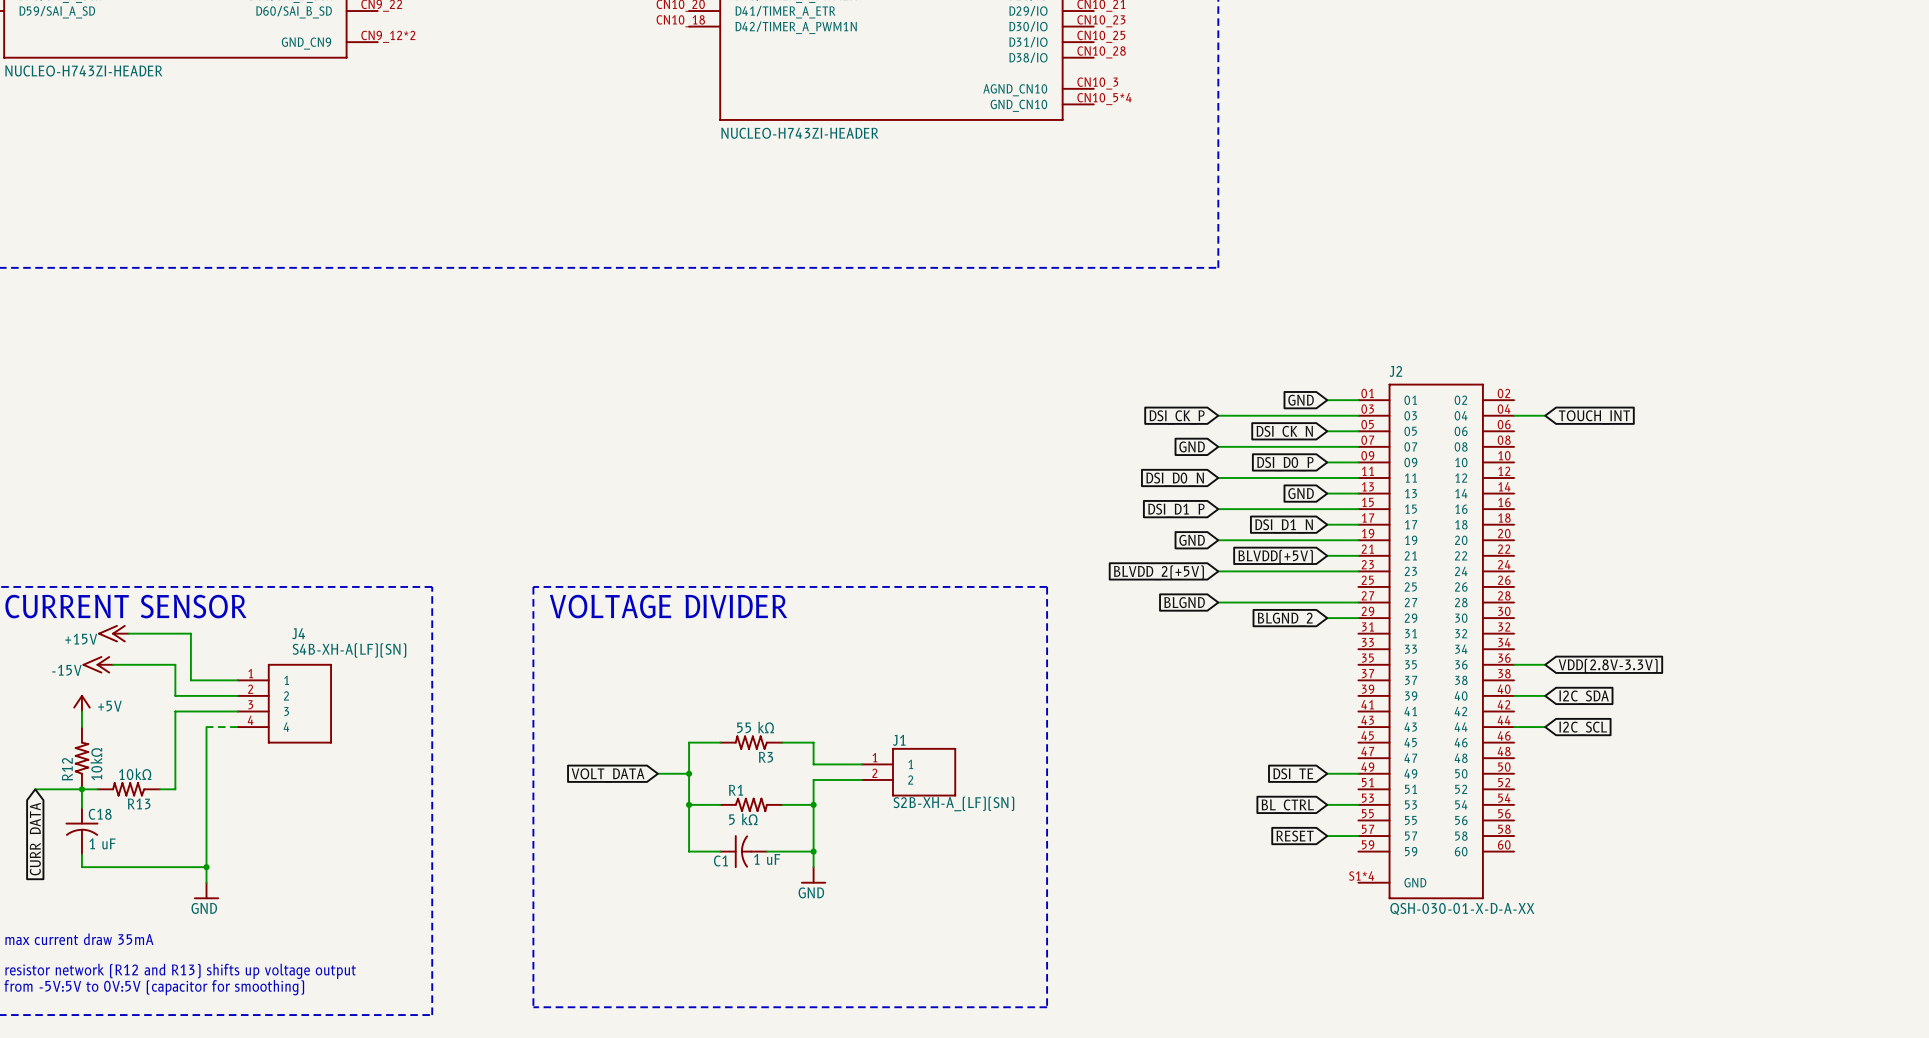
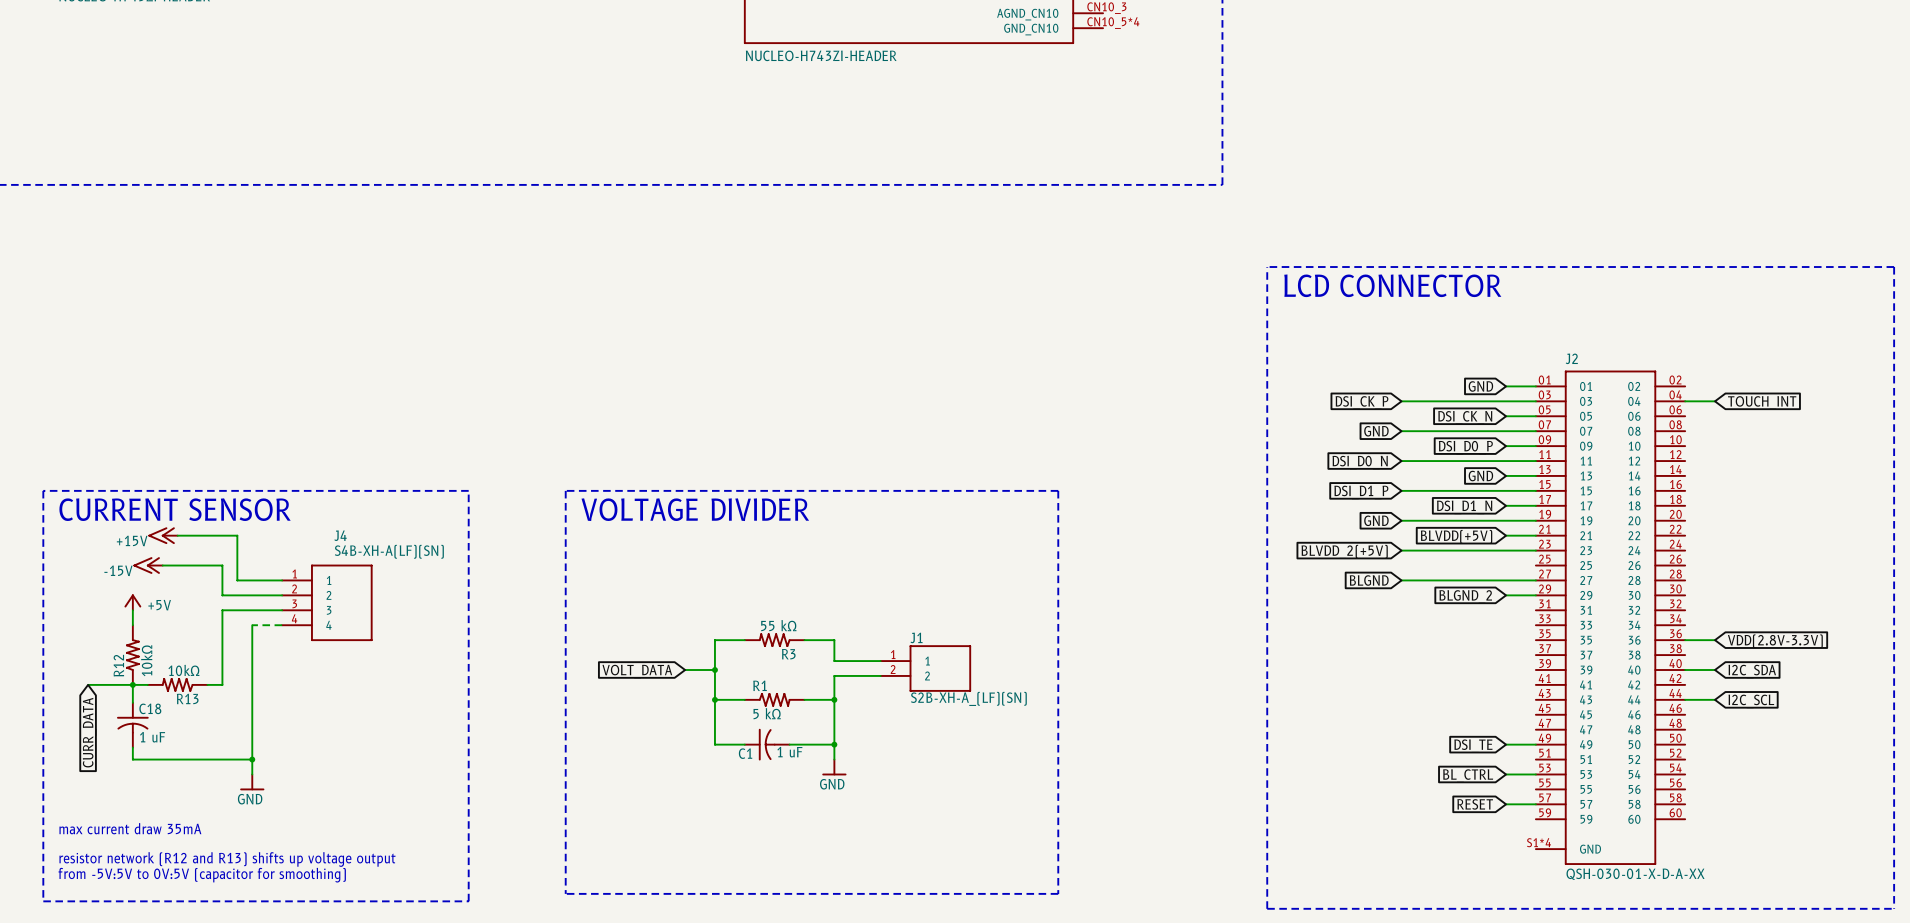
line: none -> (1267, 267) (1894, 267) (1894, 908) (1267, 908) (1267, 267)
text: none -> LCD CONNECTOR (1392, 285)
global label: GND (1301, 400) -> none
wire: (1327, 400) (1358, 400) -> none
wire: (1218, 415) (1358, 415) -> none
wire: (1514, 415) (1545, 415) -> (1506, 446) (1535, 446)
global label: DSI_CK_P (1177, 417) -> none
global label: TOUCH_INT (1594, 417) -> none
wire: (1327, 431) (1358, 431) -> none
global label: DSI_CK_N (1284, 432) -> none
global label: GND (1192, 446) -> none
wire: (1218, 446) (1358, 446) -> none
wire: (1327, 462) (1358, 462) -> none
global label: DSI_D0_P (1285, 464) -> none
wire: (1218, 478) (1358, 478) -> none
global label: none -> GND (1480, 386)
wire: none -> (1506, 386) (1535, 386)
global label: DSI_D0_N (1175, 479) -> none
global label: GND (1301, 493) -> none
wire: (1327, 493) (1358, 493) -> none
wire: none -> (1401, 401) (1535, 401)
wire: none -> (1685, 401) (1715, 401)
global label: none -> DSI_CK_P (1361, 402)
global label: none -> TOUCH_INT (1762, 402)
wire: (1218, 509) (1358, 509) -> none
wire: none -> (1506, 416) (1535, 416)
global label: DSI_D1_P (1176, 510) -> none
global label: none -> DSI_CK_N (1465, 417)
wire: (1327, 524) (1358, 524) -> none
global label: none -> GND (1376, 431)
wire: none -> (1401, 431) (1535, 431)
global label: DSI_D1_N (1284, 526) -> none
global label: GND (1192, 540) -> none
wire: (1218, 540) (1358, 540) -> none
global label: none -> DSI_D0_P (1465, 447)
wire: (1327, 555) (1358, 555) -> none
wire: none -> (1401, 461) (1535, 461)
global label: BLVDD(+5V) (1275, 557) -> none
global label: none -> DSI_D0_N (1360, 462)
wire: (1218, 571) (1358, 571) -> none
global label: none -> GND (1480, 476)
global label: BLVDD_2(+5V) (1158, 572) -> none
wire: none -> (1401, 490) (1535, 490)
global label: none -> DSI_D1_P (1361, 492)
global label: BLGND (1184, 602) -> none
wire: (1218, 602) (1358, 602) -> none
wire: none -> (1506, 505) (1535, 505)
global label: none -> DSI_D1_N (1464, 507)
wire: (1327, 618) (1358, 618) -> none
global label: none -> GND (1376, 520)
wire: none -> (1401, 520) (1535, 520)
global label: BLGND_2 (1285, 619) -> none
global label: none -> BLVDD(+5V) (1456, 536)
J2 position: (1436, 641) -> (1610, 617)
wire: none -> (1401, 550) (1535, 550)
global label: none -> BLVDD_2(+5V) (1344, 551)
wire: (1514, 664) (1545, 664) -> (1506, 475) (1535, 475)
global label: VDD(2.8V-3.3V) (1608, 666) -> none
global label: none -> BLGND (1369, 580)
wire: none -> (1401, 580) (1535, 580)
global label: none -> BLGND_2 (1465, 596)
global label: I2C_SDA (1584, 697) -> none
wire: (1514, 727) (1545, 727) -> (1506, 535) (1535, 535)
global label: I2C_SCL (1583, 728) -> none
wire: none -> (1685, 640) (1715, 640)
global label: none -> VDD(2.8V-3.3V) (1775, 641)
wire: (1327, 773) (1358, 773) -> none
wire: none -> (1685, 670) (1715, 670)
global label: DSI_TE (1293, 775) -> none
global label: none -> I2C_SDA (1752, 671)
wire: (1327, 804) (1358, 804) -> none
wire: none -> (1685, 699) (1715, 699)
global label: BL_CTRL (1287, 806) -> none
global label: none -> I2C_SCL (1751, 701)
global label: RESET (1295, 836) -> none
wire: (1327, 836) (1358, 836) -> none
wire: none -> (1506, 744) (1535, 744)
global label: none -> DSI_TE (1473, 746)
wire: none -> (1506, 774) (1535, 774)
global label: none -> BL_CTRL (1468, 776)
global label: none -> RESET (1475, 804)
wire: none -> (1506, 804) (1535, 804)

